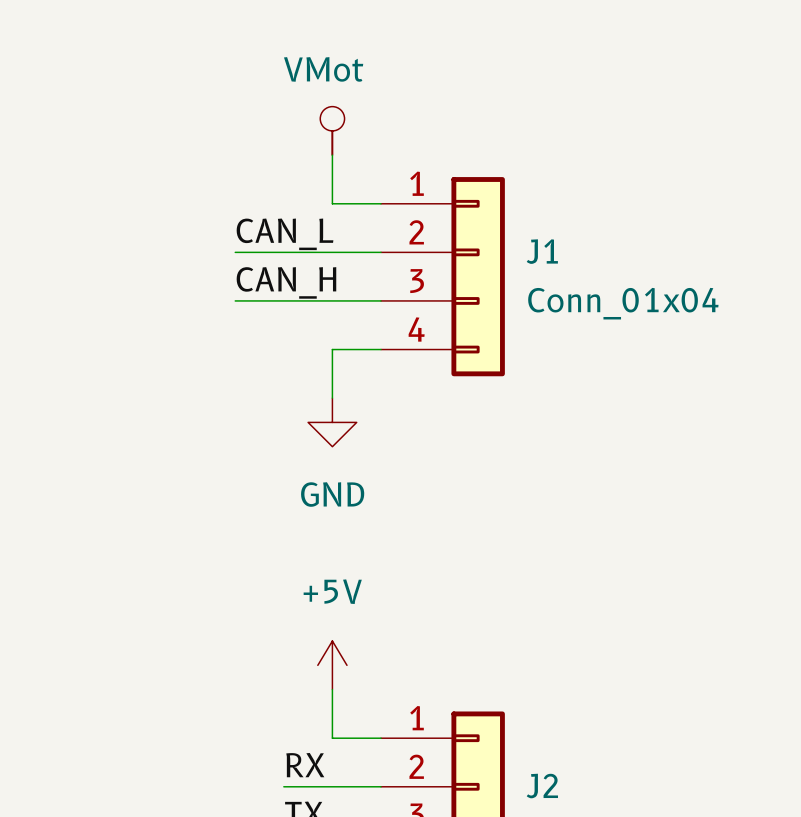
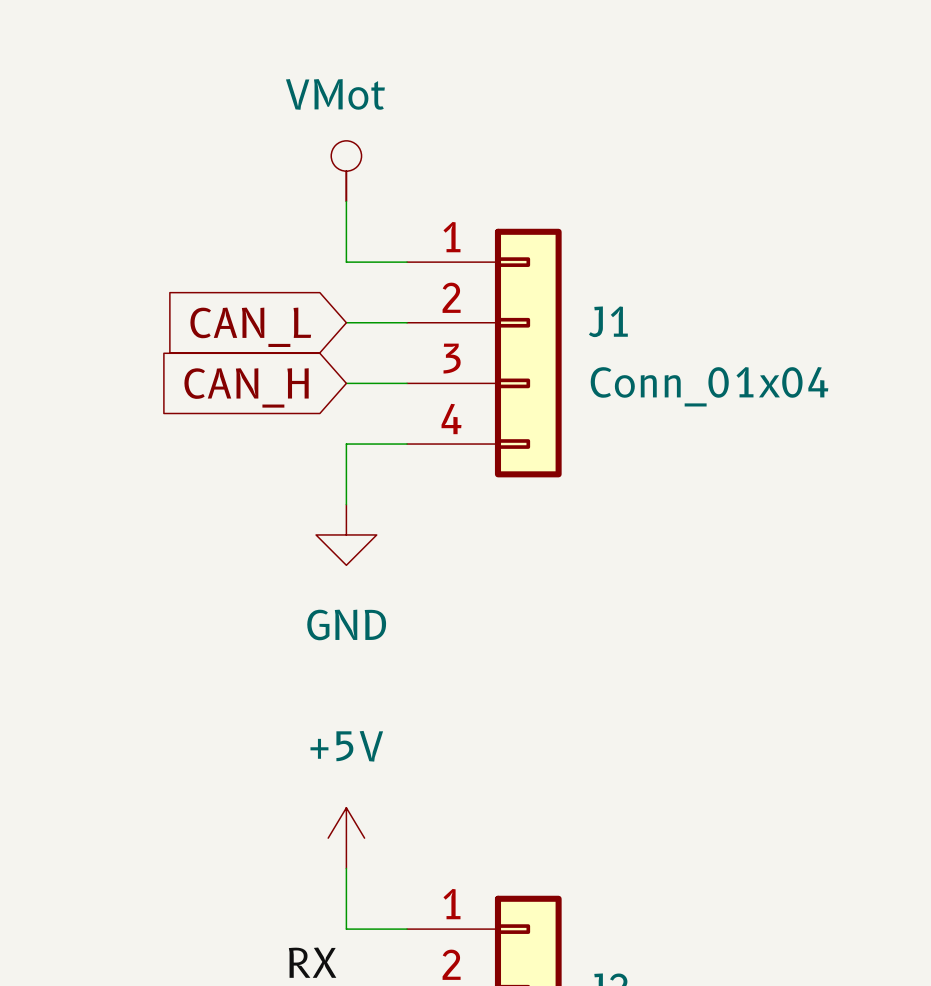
label: CAN_L (285, 234) -> none
wire: (235, 252) (332, 252) -> none
global label: none -> CAN_L (250, 327)
label: CAN_H (286, 282) -> none
wire: (235, 300) (332, 300) -> none
global label: none -> CAN_H (246, 387)

